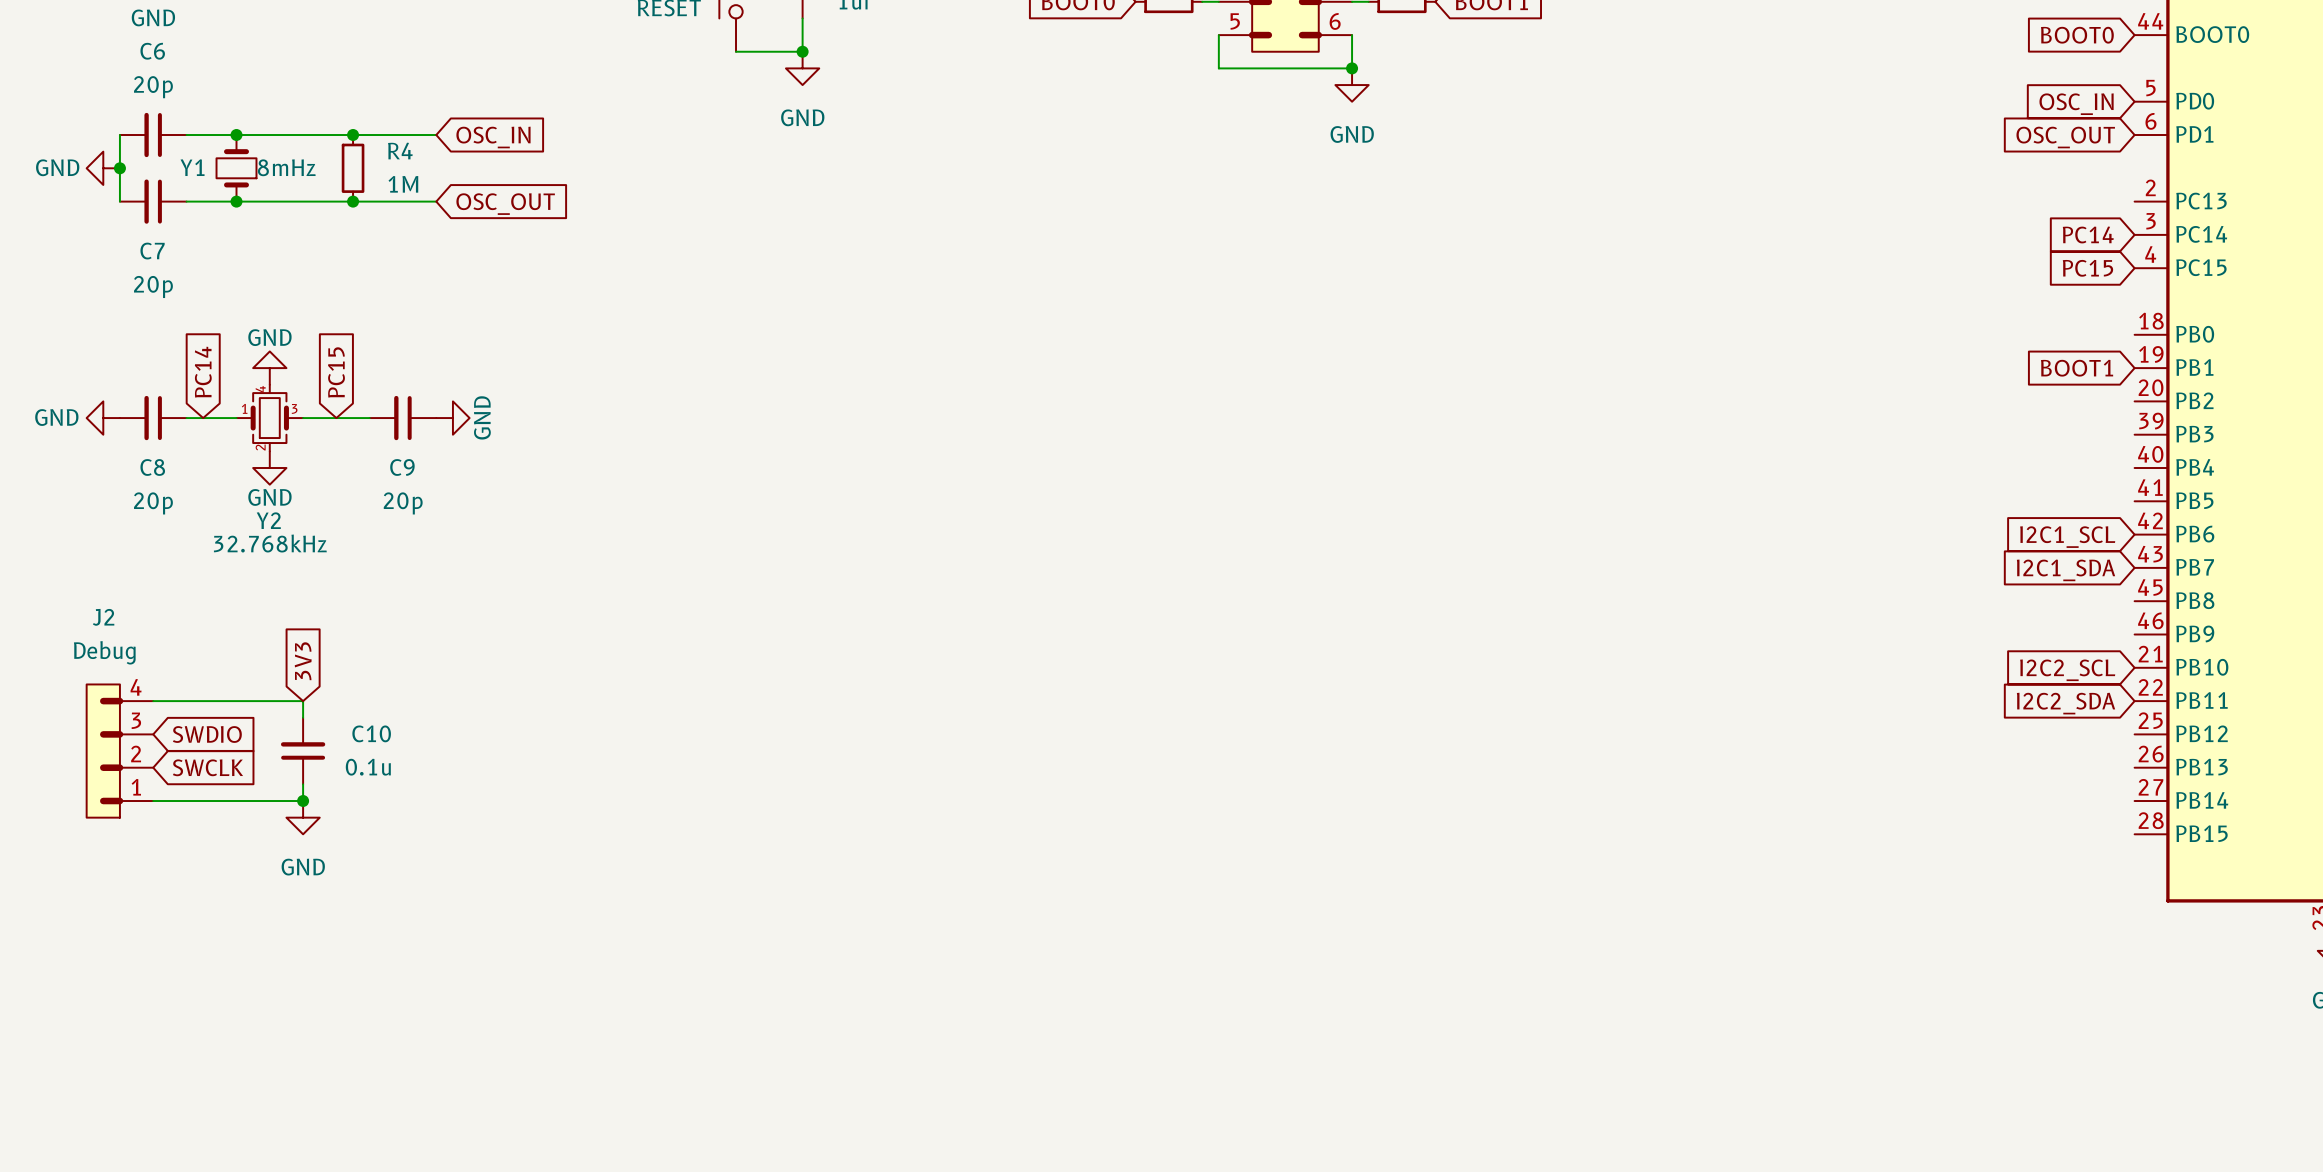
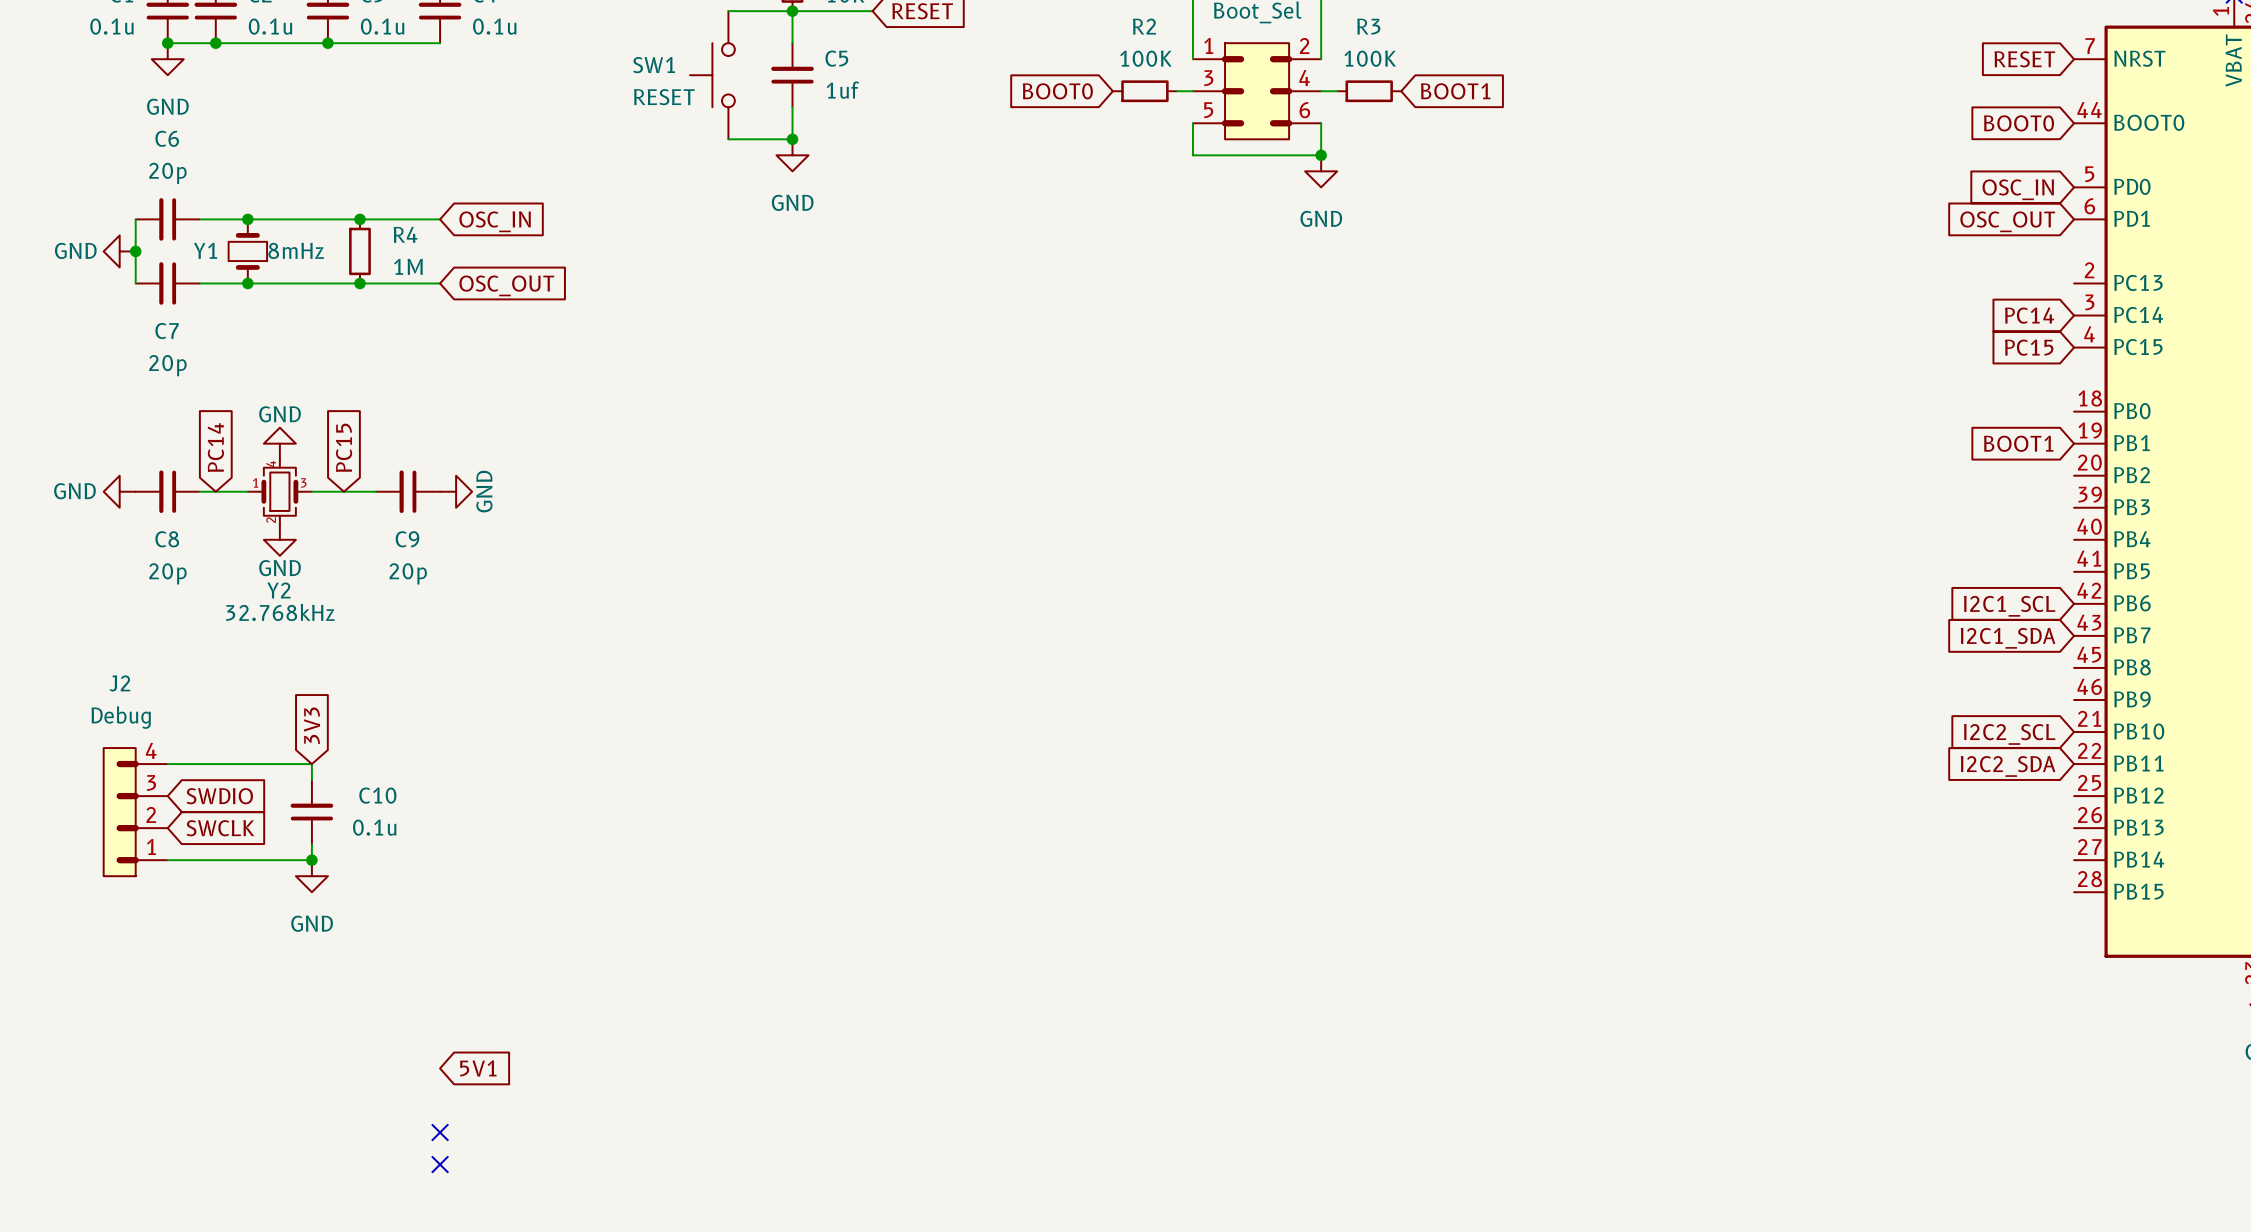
global label: none -> 5V1 (478, 1068)
no-connect mark: none -> (440, 1132)
no-connect mark: none -> (440, 1164)

